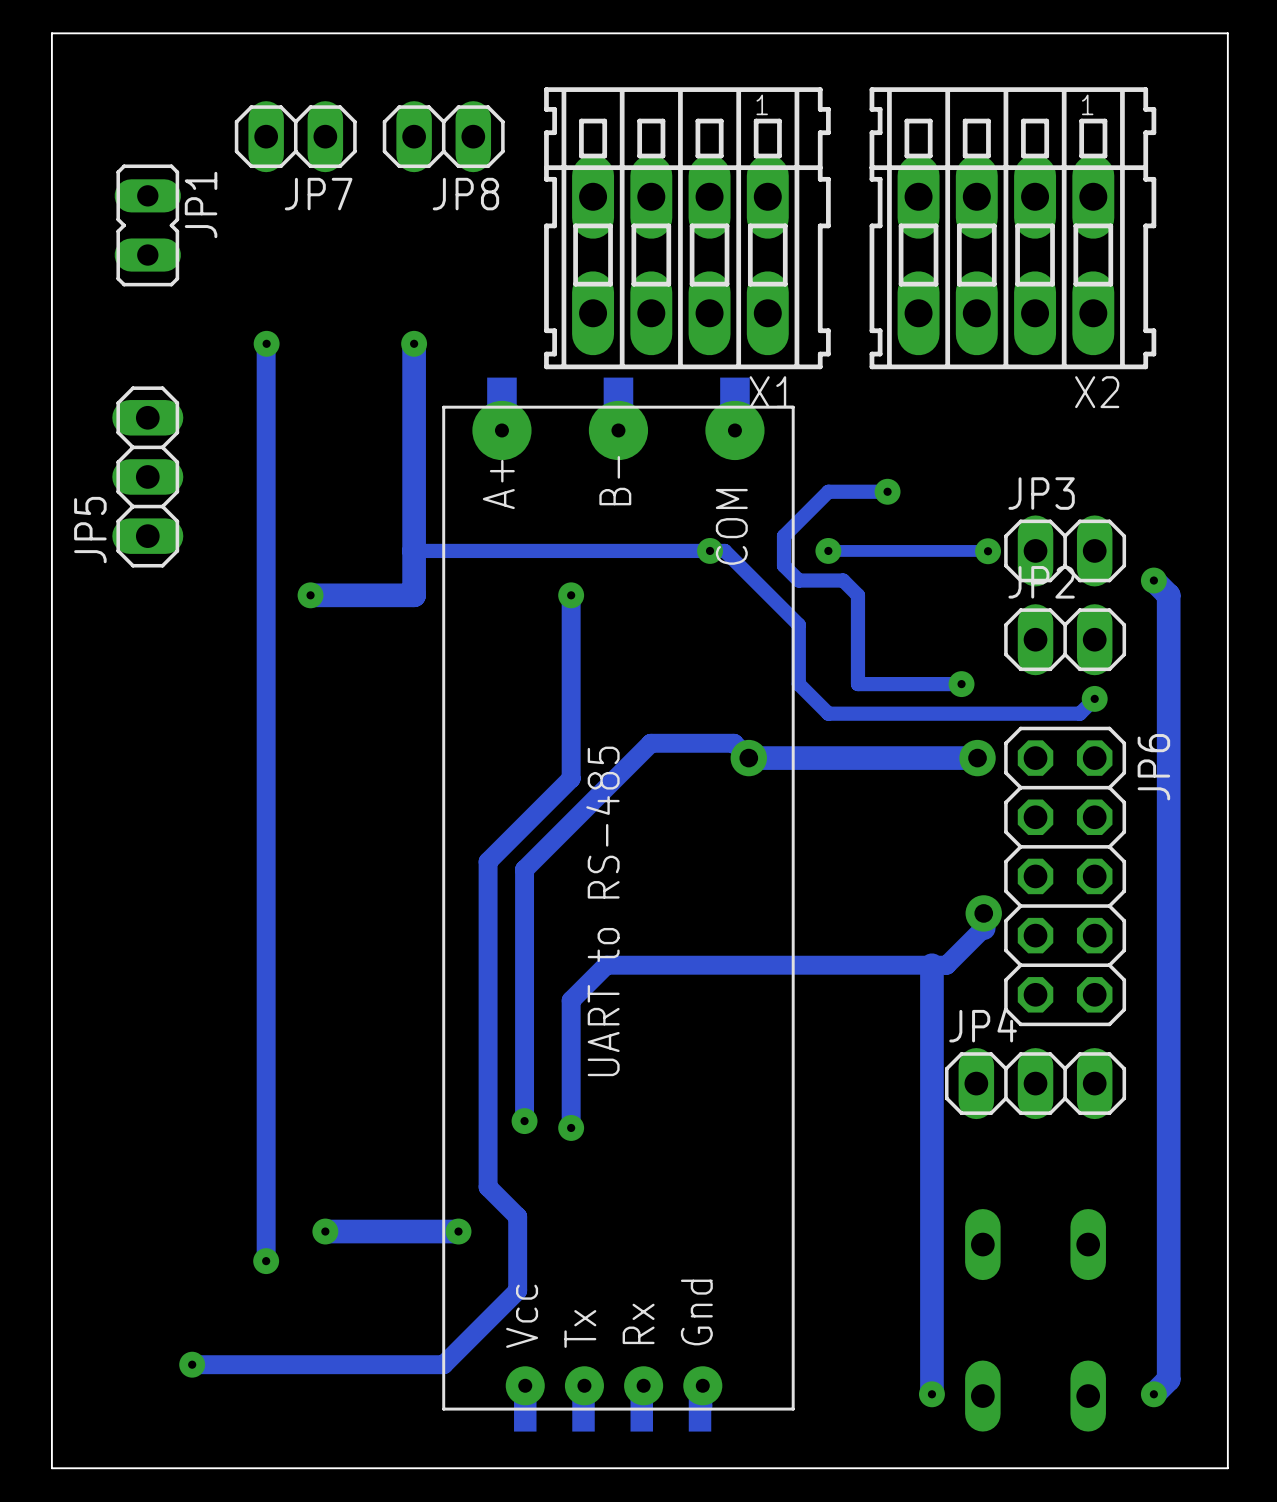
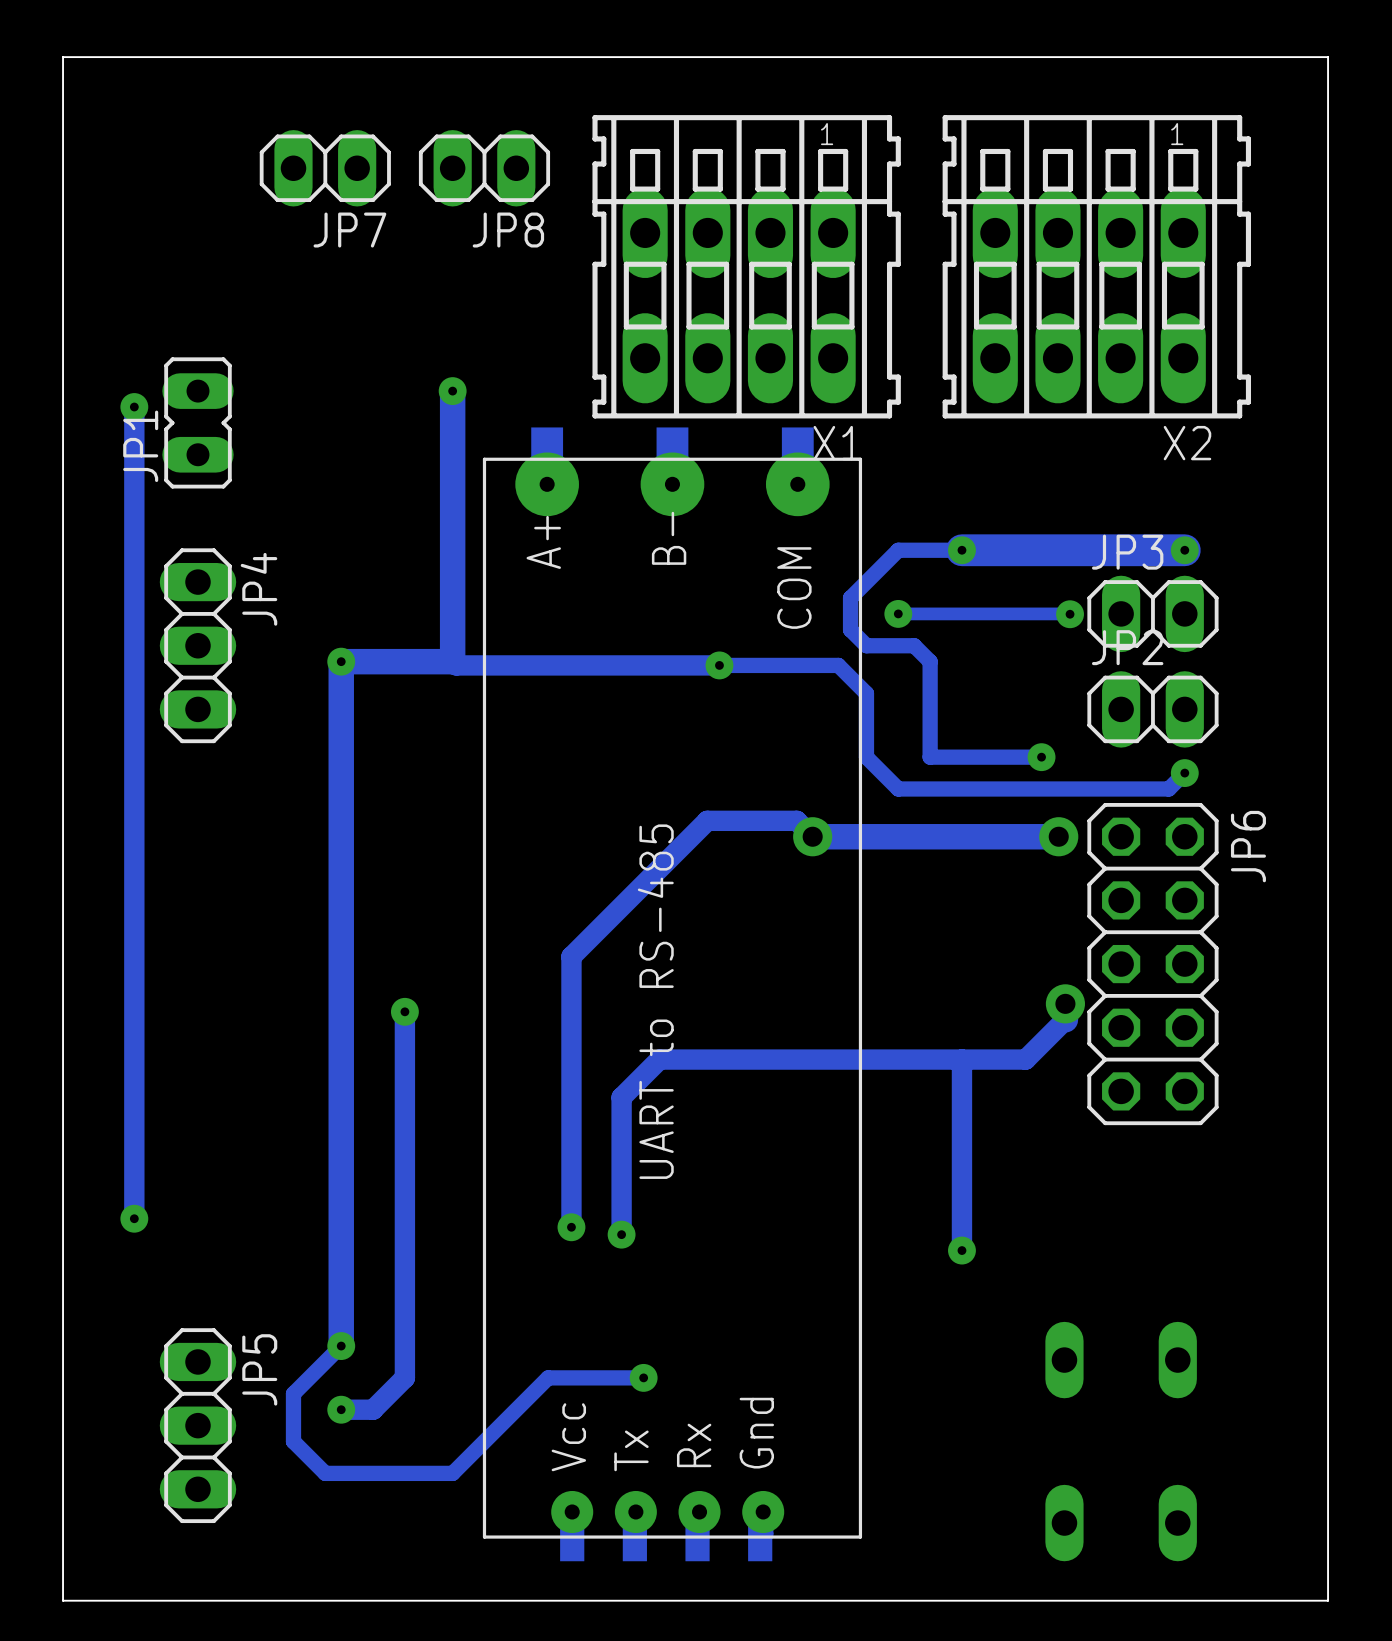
JP1 name position: JP1 (201, 204) -> JP1 (140, 446)
JP1 position: (147, 225) -> (198, 422)
track: (266, 343) (266, 1261) -> none
via: (266, 343) -> none
track: none -> (134, 407) (134, 1218)
via: none -> (134, 407)
JP5 position: (147, 476) -> (198, 1425)
track: none -> (1184, 550) (961, 550)
JP5 name position: JP5 (90, 530) -> JP5 (259, 1369)
track: (414, 550) (724, 550) (772, 598) -> (452, 661) (456, 665) (838, 665)
via: (710, 550) -> none
track: (1153, 580) (1168, 595) (1168, 1379) (1153, 1394) -> none
via position: (1153, 580) -> (1184, 550)
track: none -> (341, 661) (341, 1346) (293, 1393) (293, 1441) (325, 1473) (452, 1473) (548, 1377) (643, 1377)
track: (571, 595) (571, 778) (488, 861) (488, 1187) (517, 1216) (517, 1290) (443, 1364) (192, 1364) -> none
via: (571, 595) -> none
via: none -> (719, 665)
track: none -> (404, 1011) (404, 1377) (373, 1409) (341, 1409)
via: none -> (404, 1011)
track: none -> (961, 1059) (961, 1250)
track: (931, 965) (931, 1394) -> none
JP4 rotation: 0° (1035, 1083) -> 90° clockwise (198, 645)
JP4 position: (1035, 1083) -> (198, 645)
via: none -> (134, 1218)
via: none -> (961, 1250)
via position: (325, 1231) -> (341, 1346)
track: (458, 1231) (325, 1231) -> none
via: (458, 1231) -> none
via: (266, 1261) -> none
via: none -> (643, 1377)
via: none -> (341, 1409)
via: (192, 1364) -> none
via: (931, 1394) -> none
via: (1153, 1394) -> none

